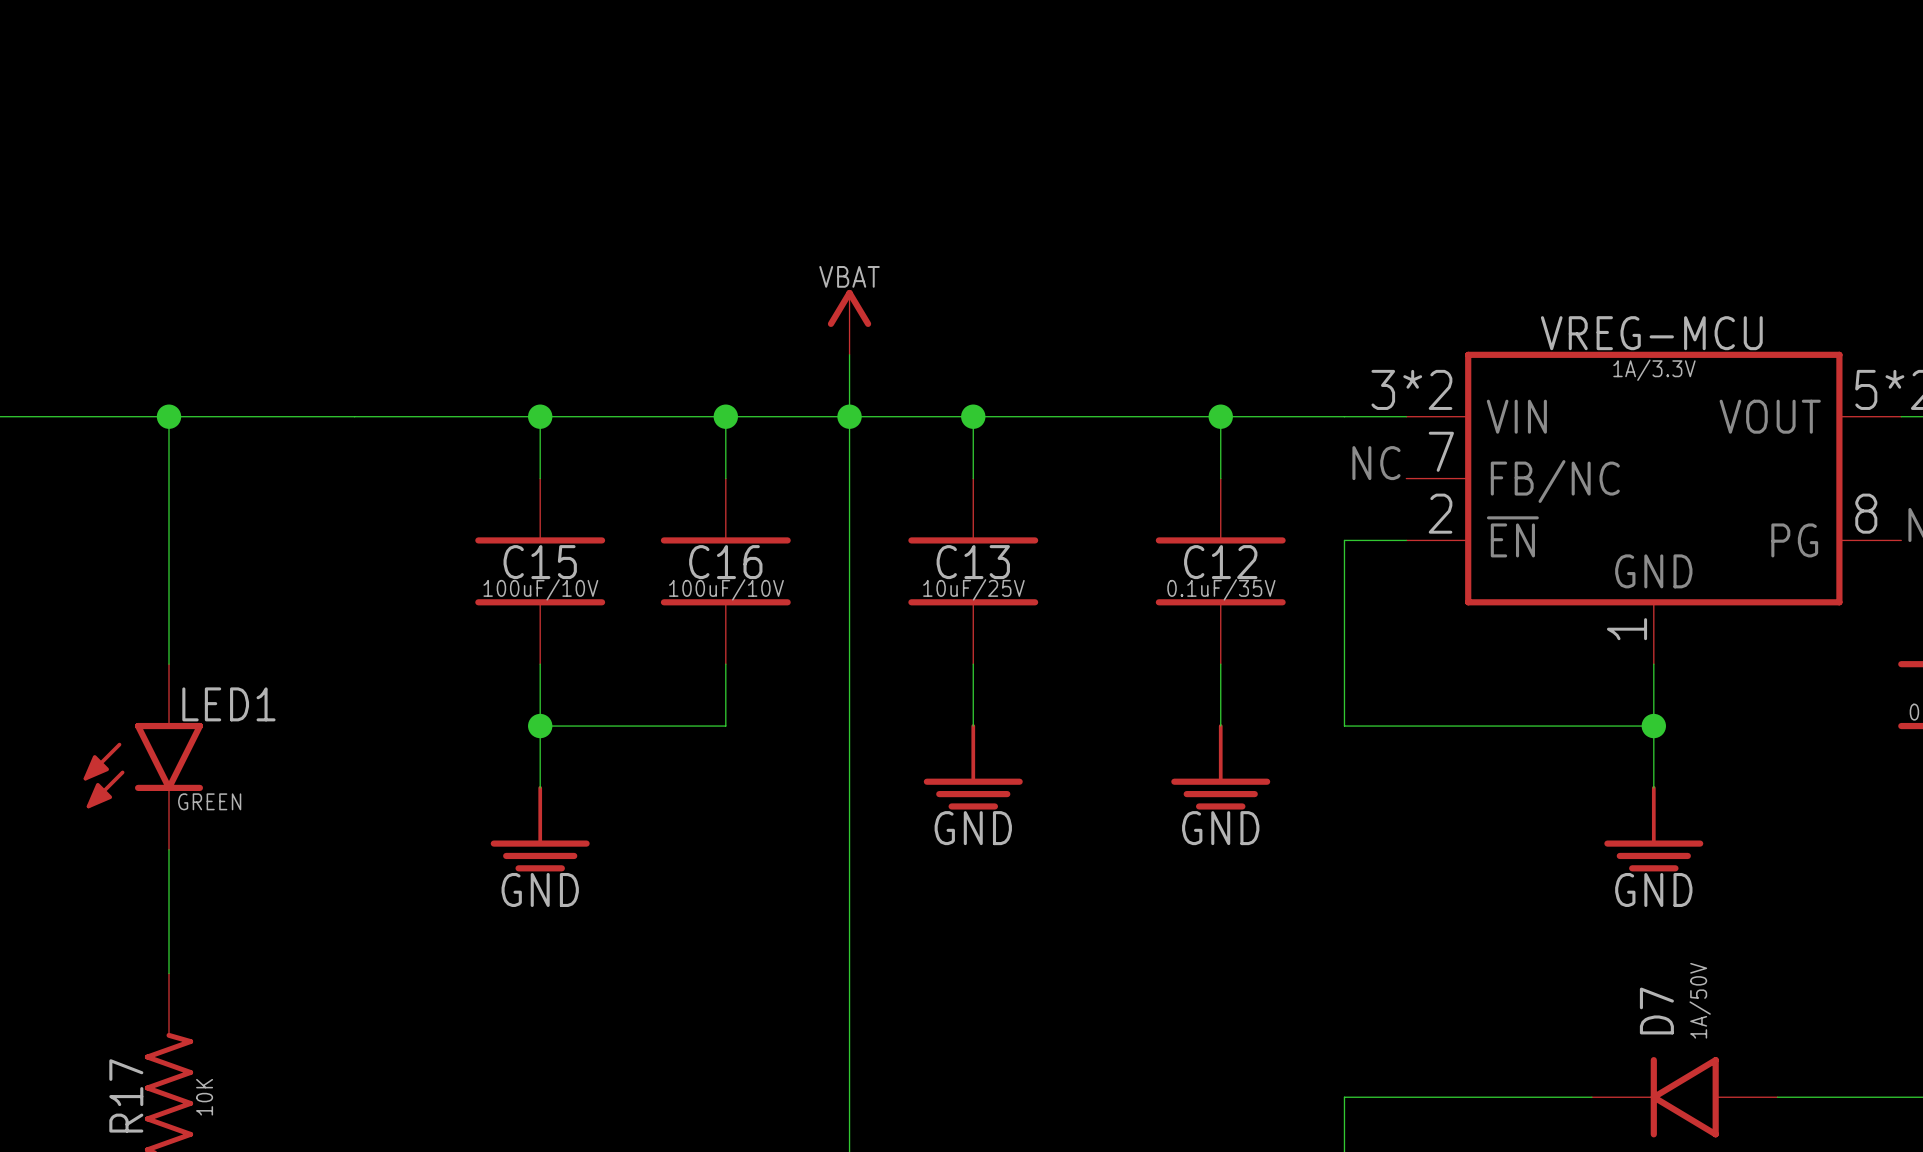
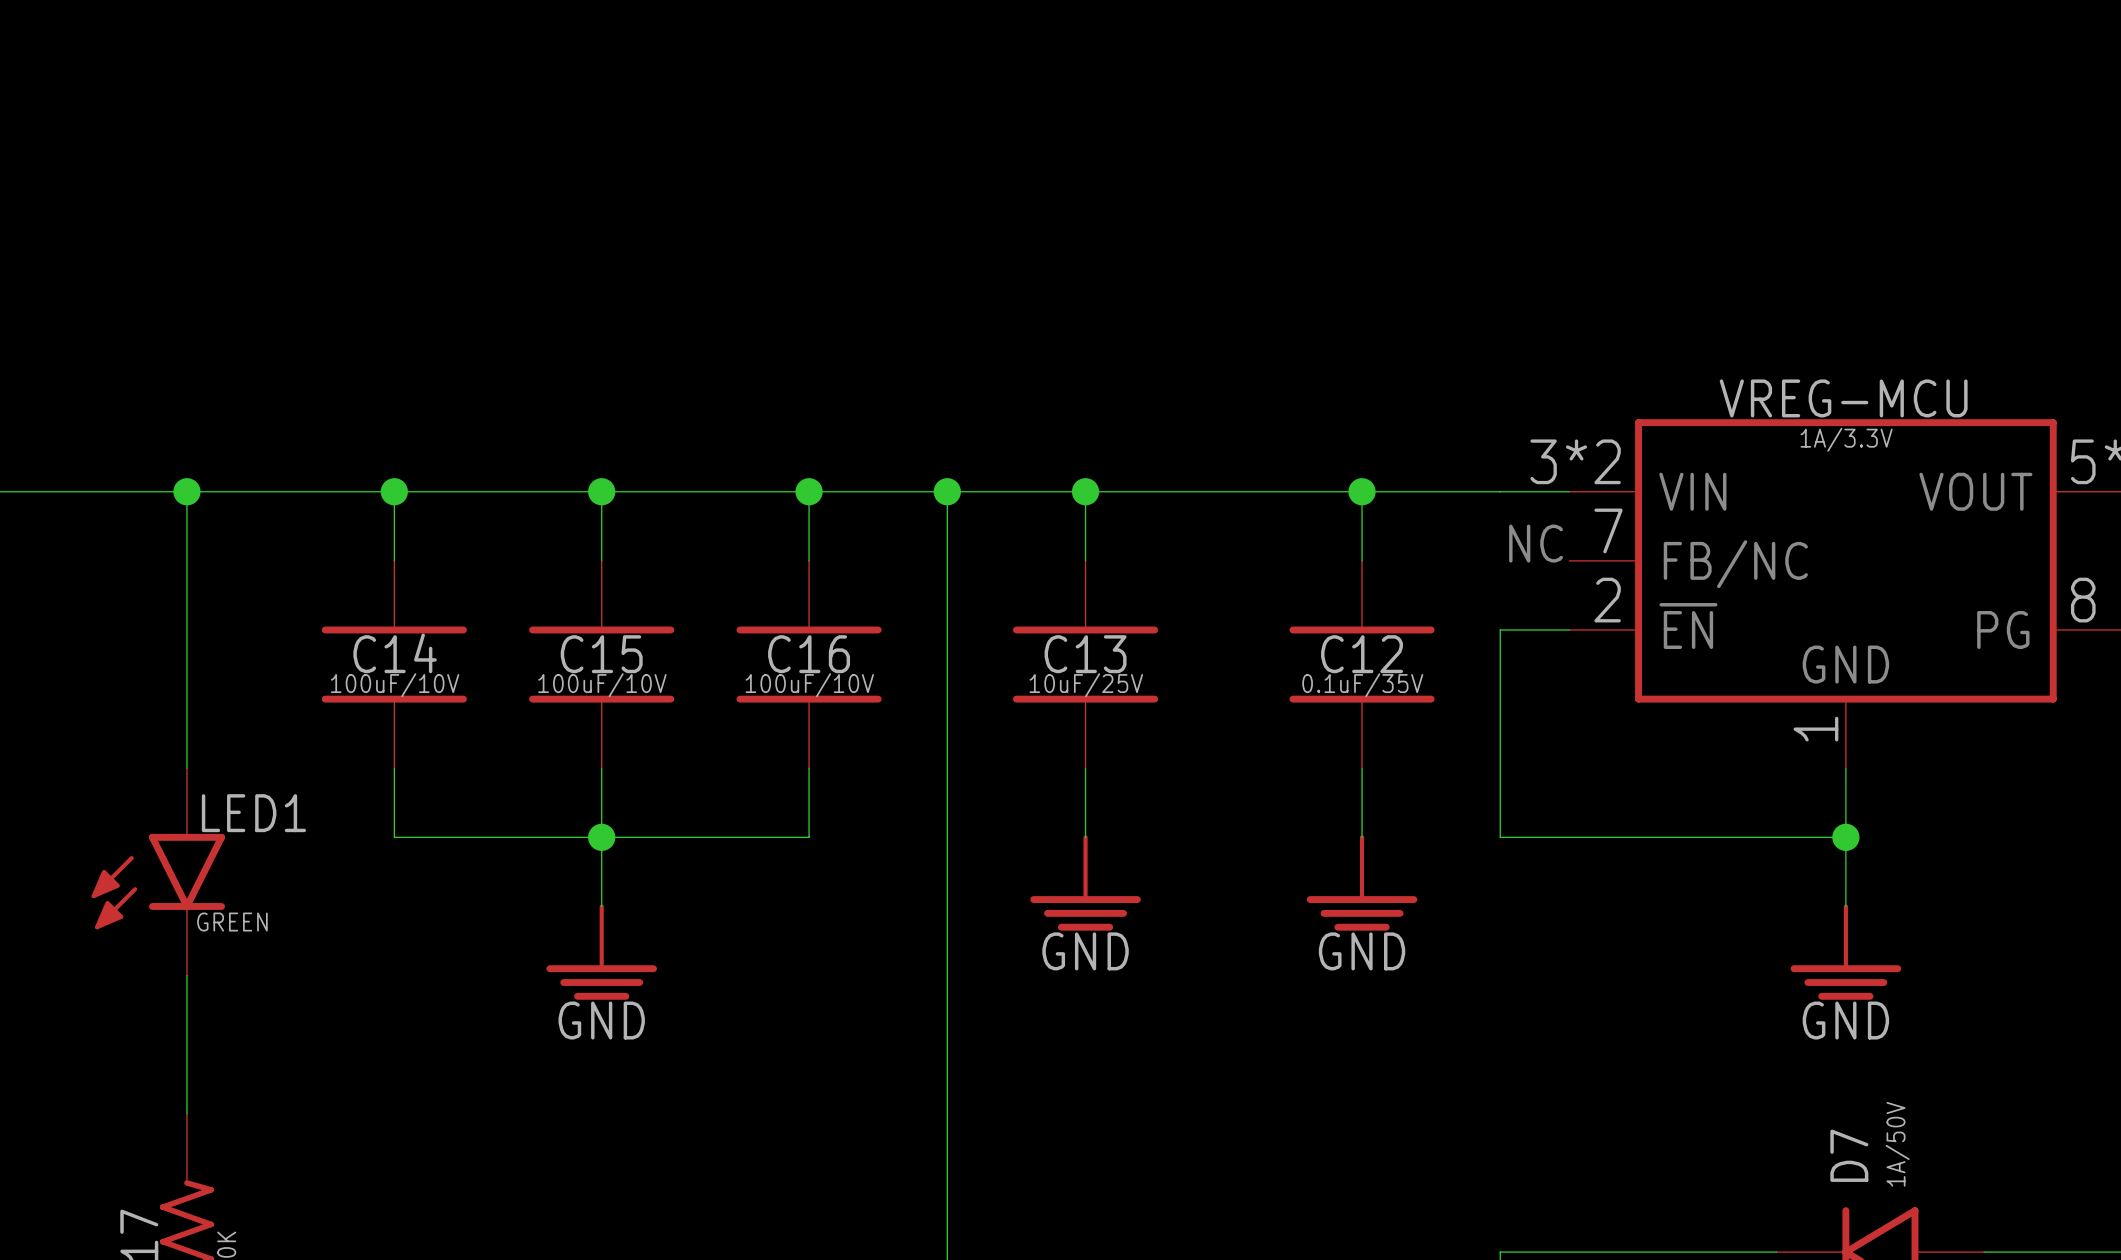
power symbol: (849, 322) -> none
wire: (849, 354) (849, 416) -> (394, 491) (394, 560)
junction: none -> (394, 491)
C14: none -> 100uF/10V (394, 664)
wire: none -> (394, 768) (394, 837) (601, 837)

